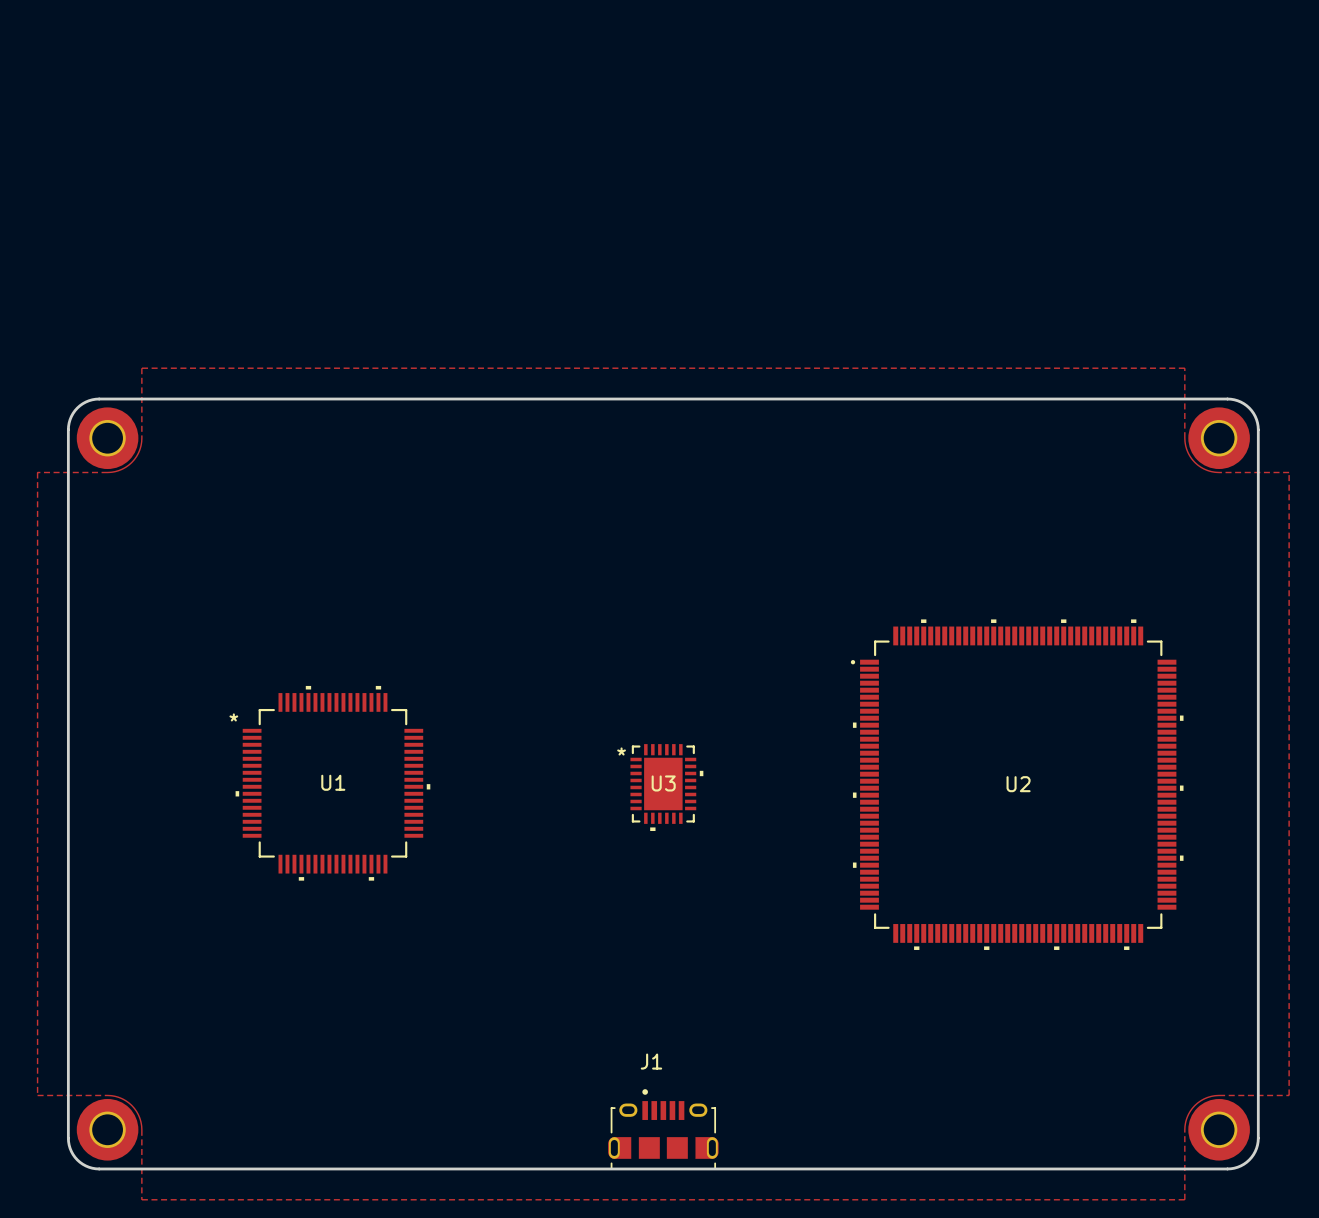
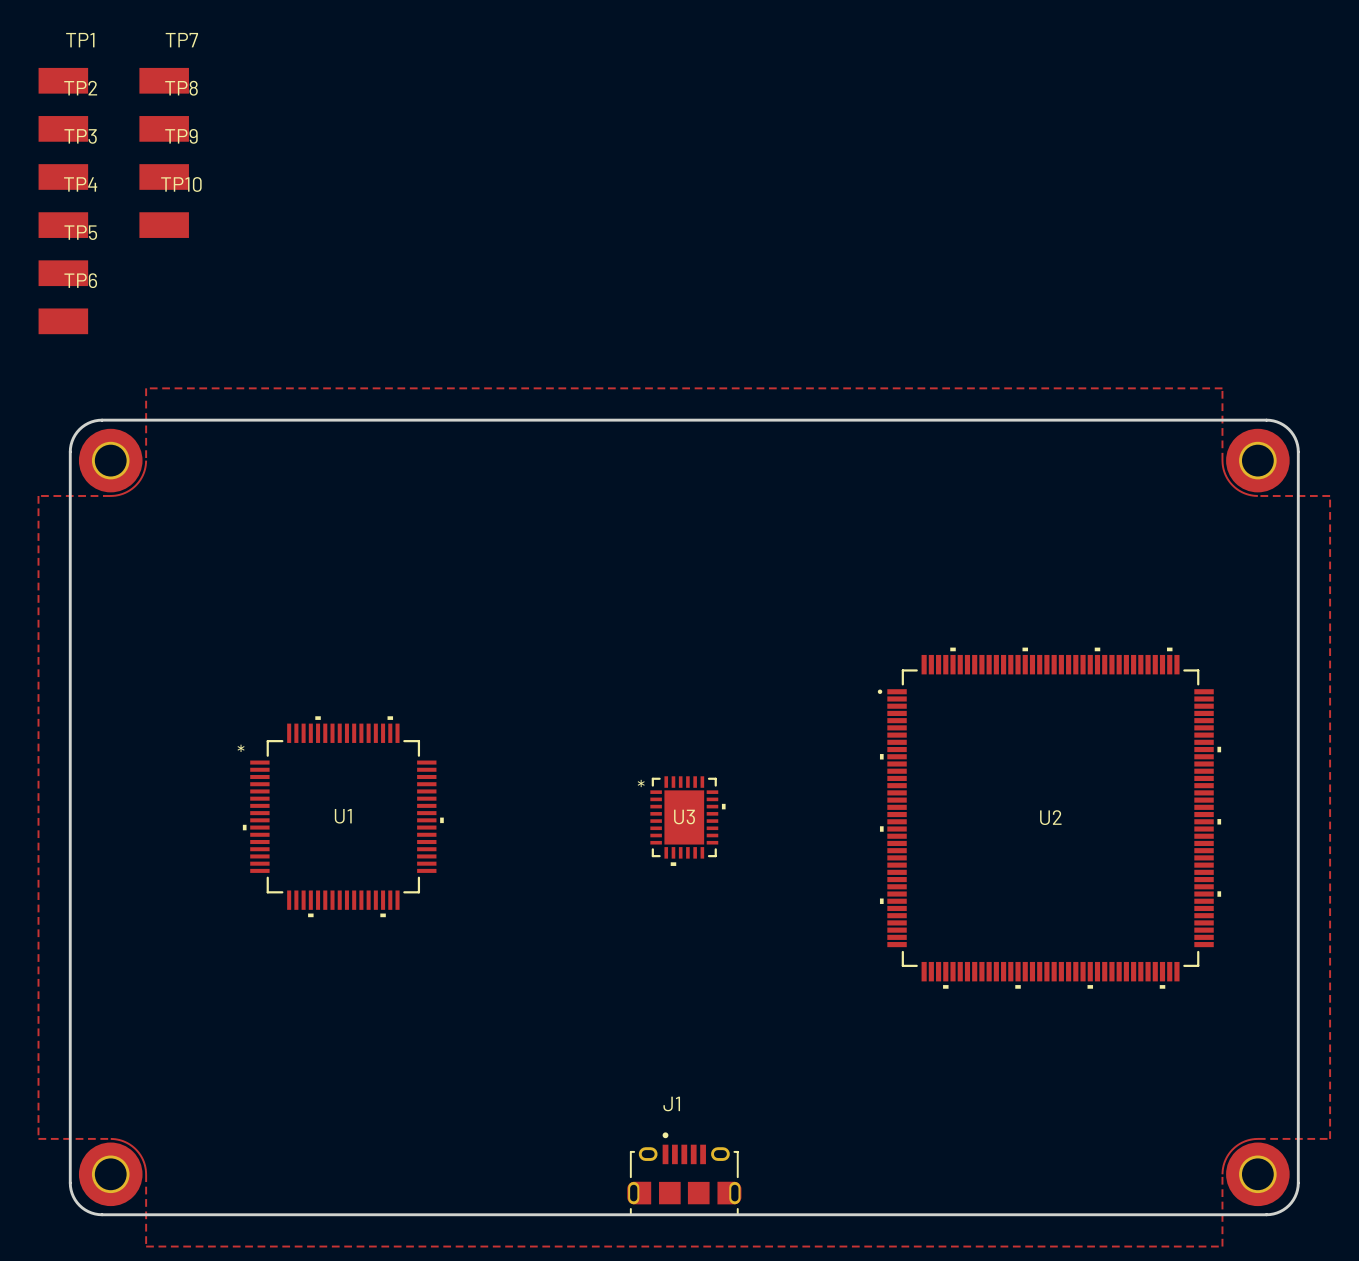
TP1: none -> (63, 80)
TP7: none -> (164, 80)
TP2: none -> (63, 128)
TP8: none -> (164, 128)
TP3: none -> (63, 176)
TP9: none -> (164, 176)
TP4: none -> (63, 225)
TP10: none -> (164, 225)
TP5: none -> (63, 273)
TP6: none -> (63, 321)

